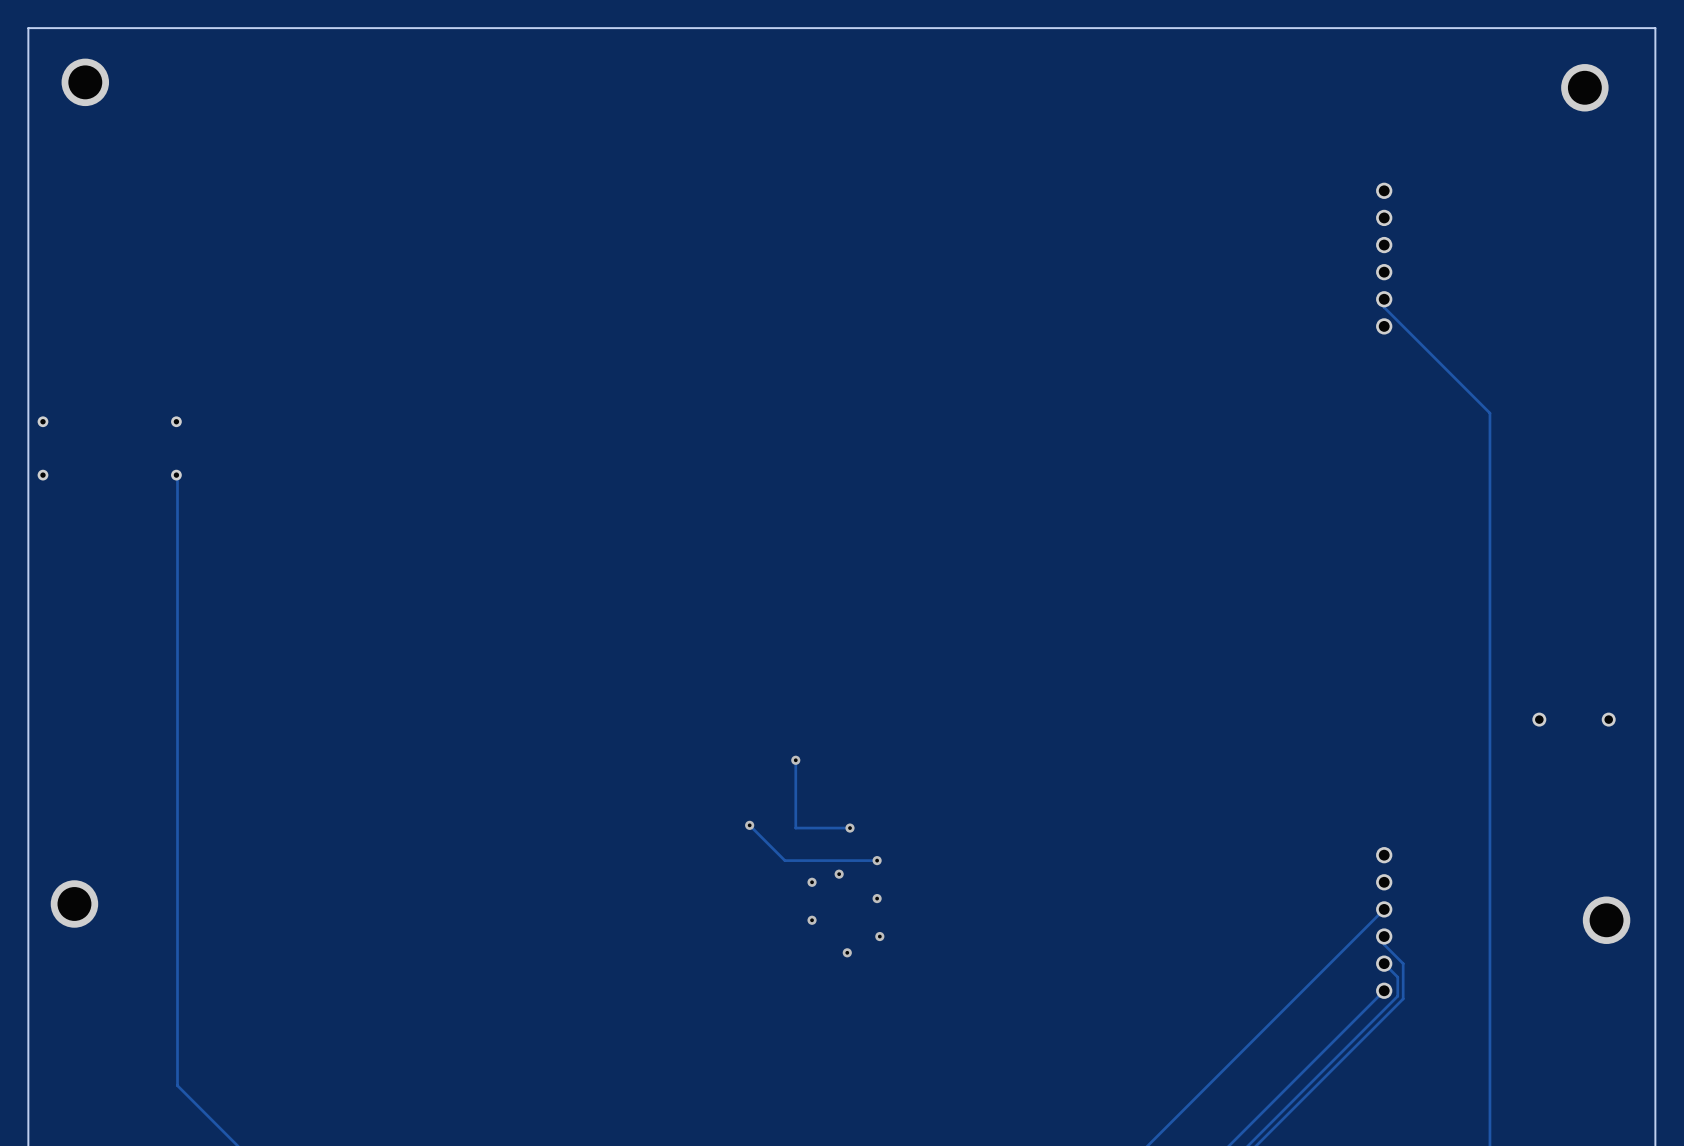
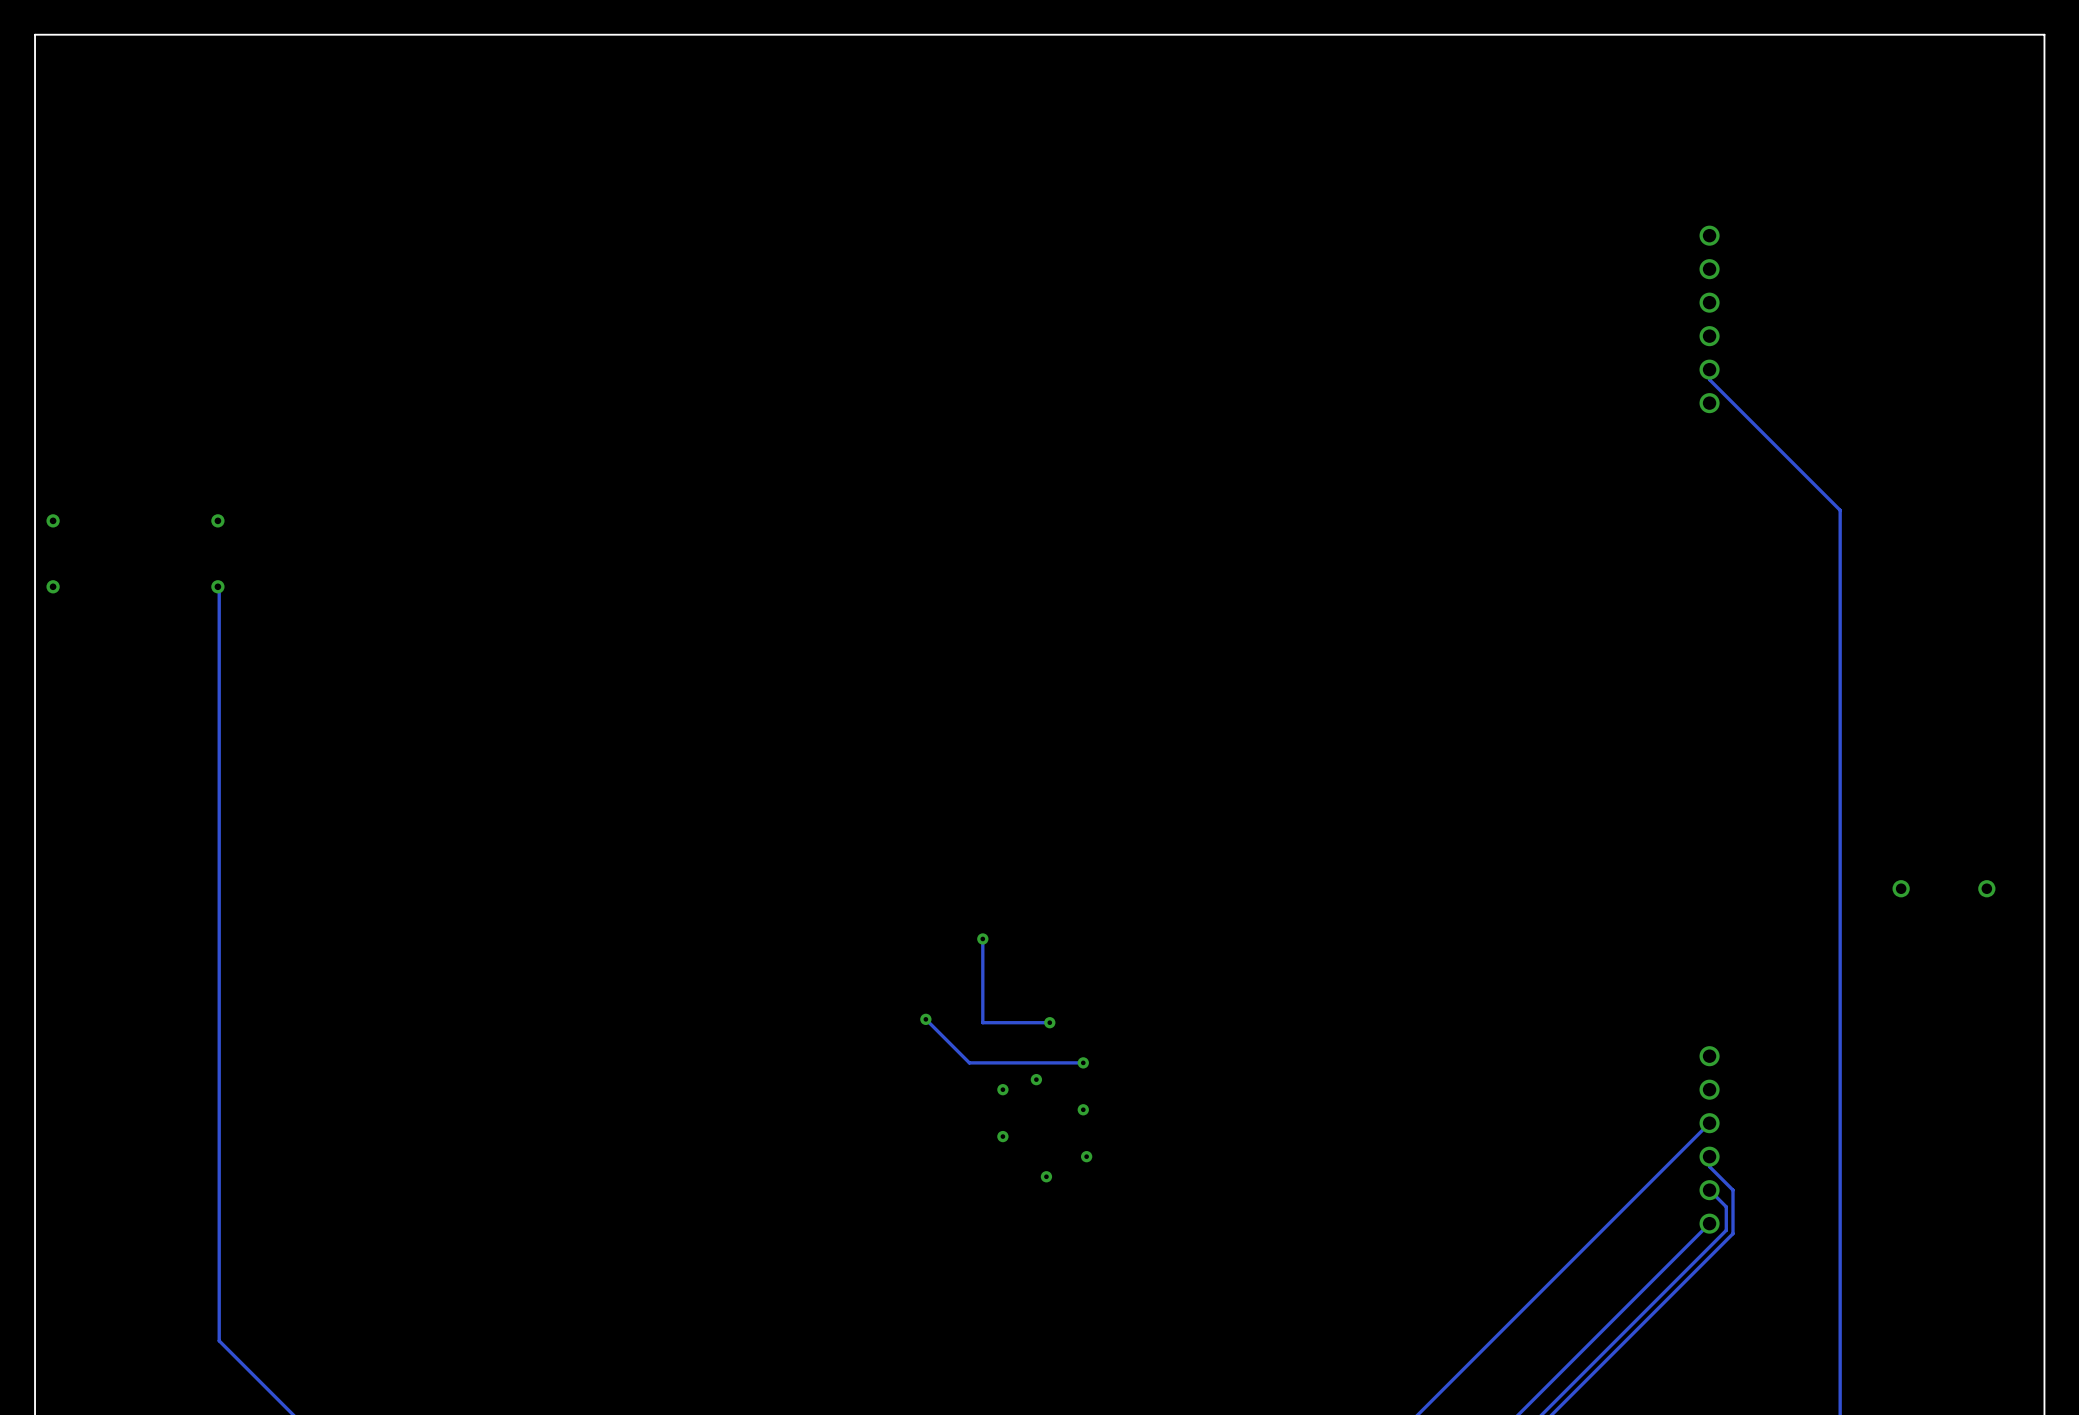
part: (85, 82) -> none
part: (1584, 87) -> none
part: (74, 903) -> none
part: (1606, 920) -> none

